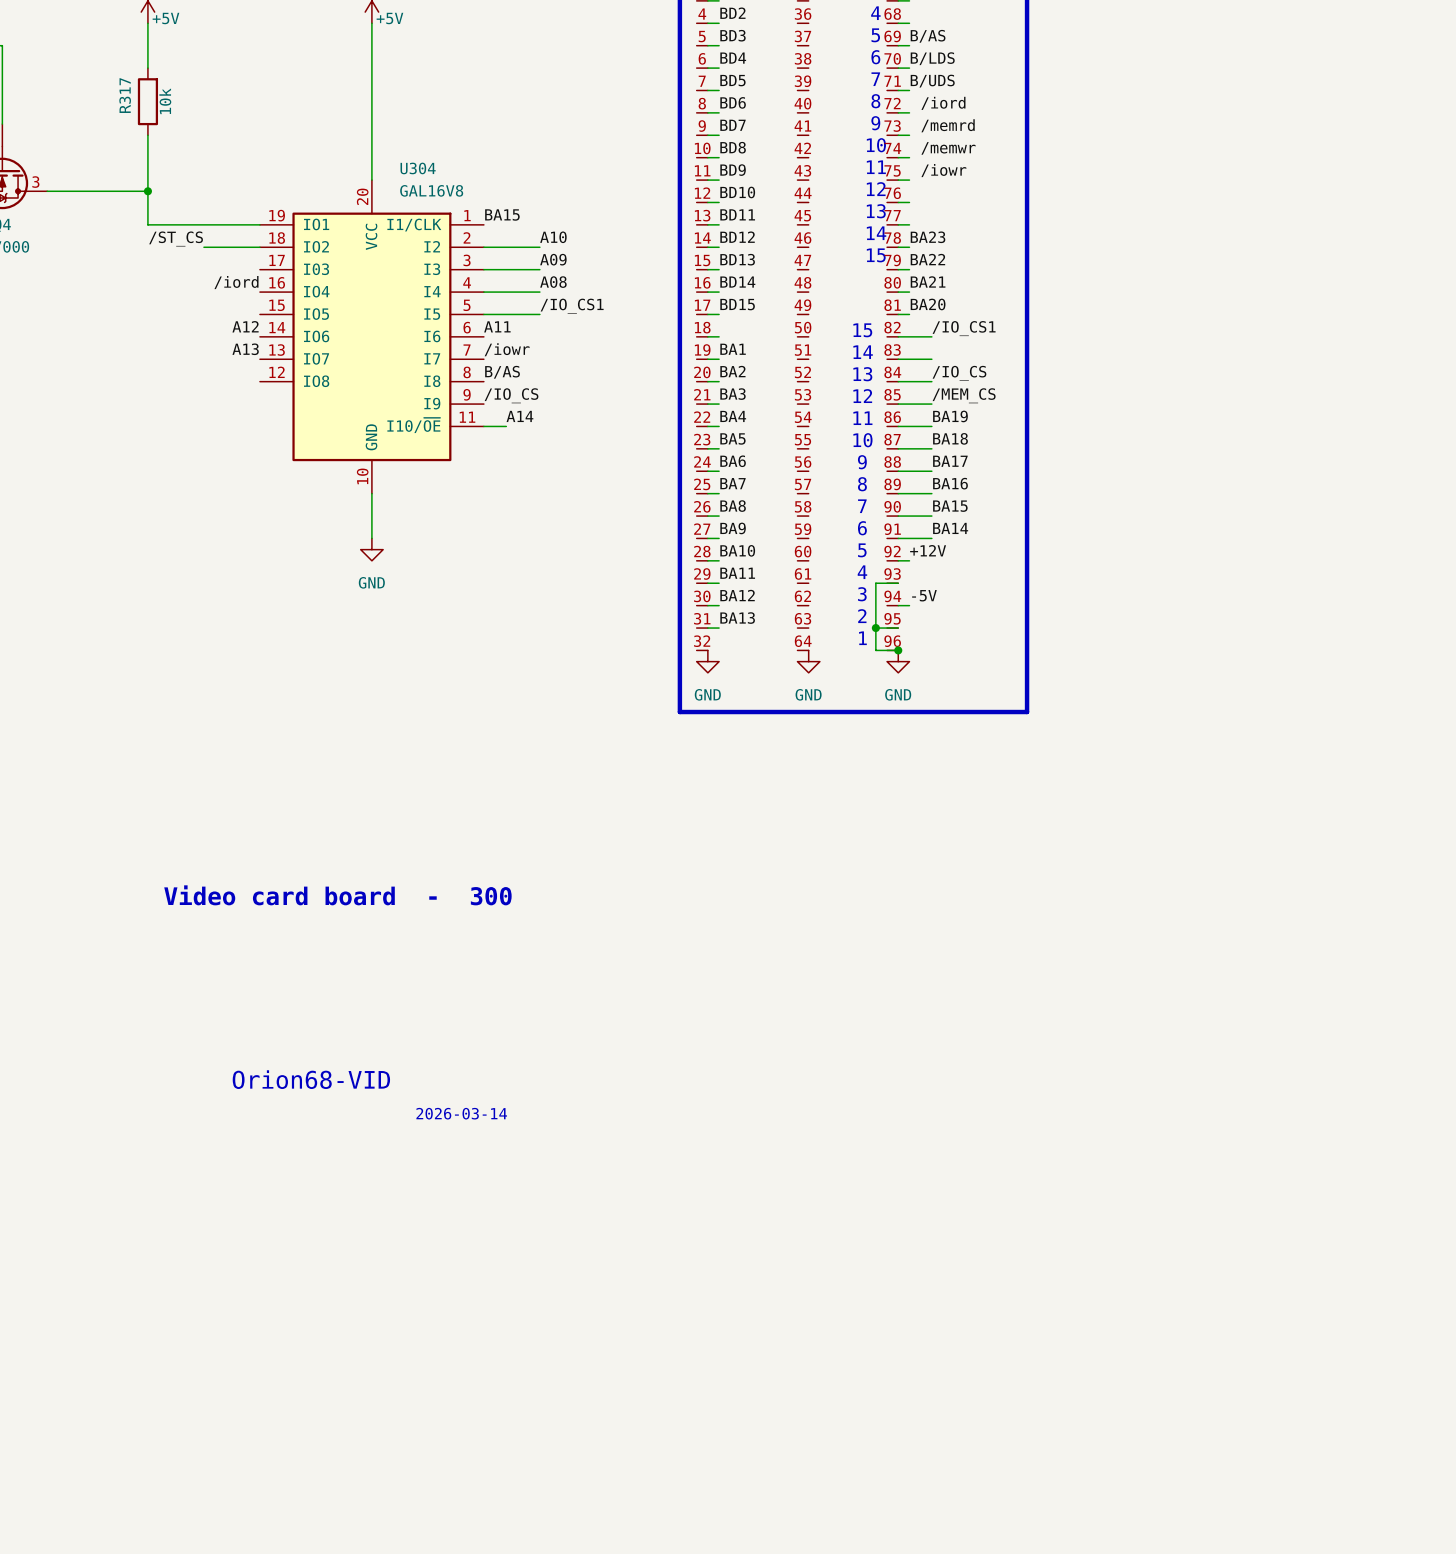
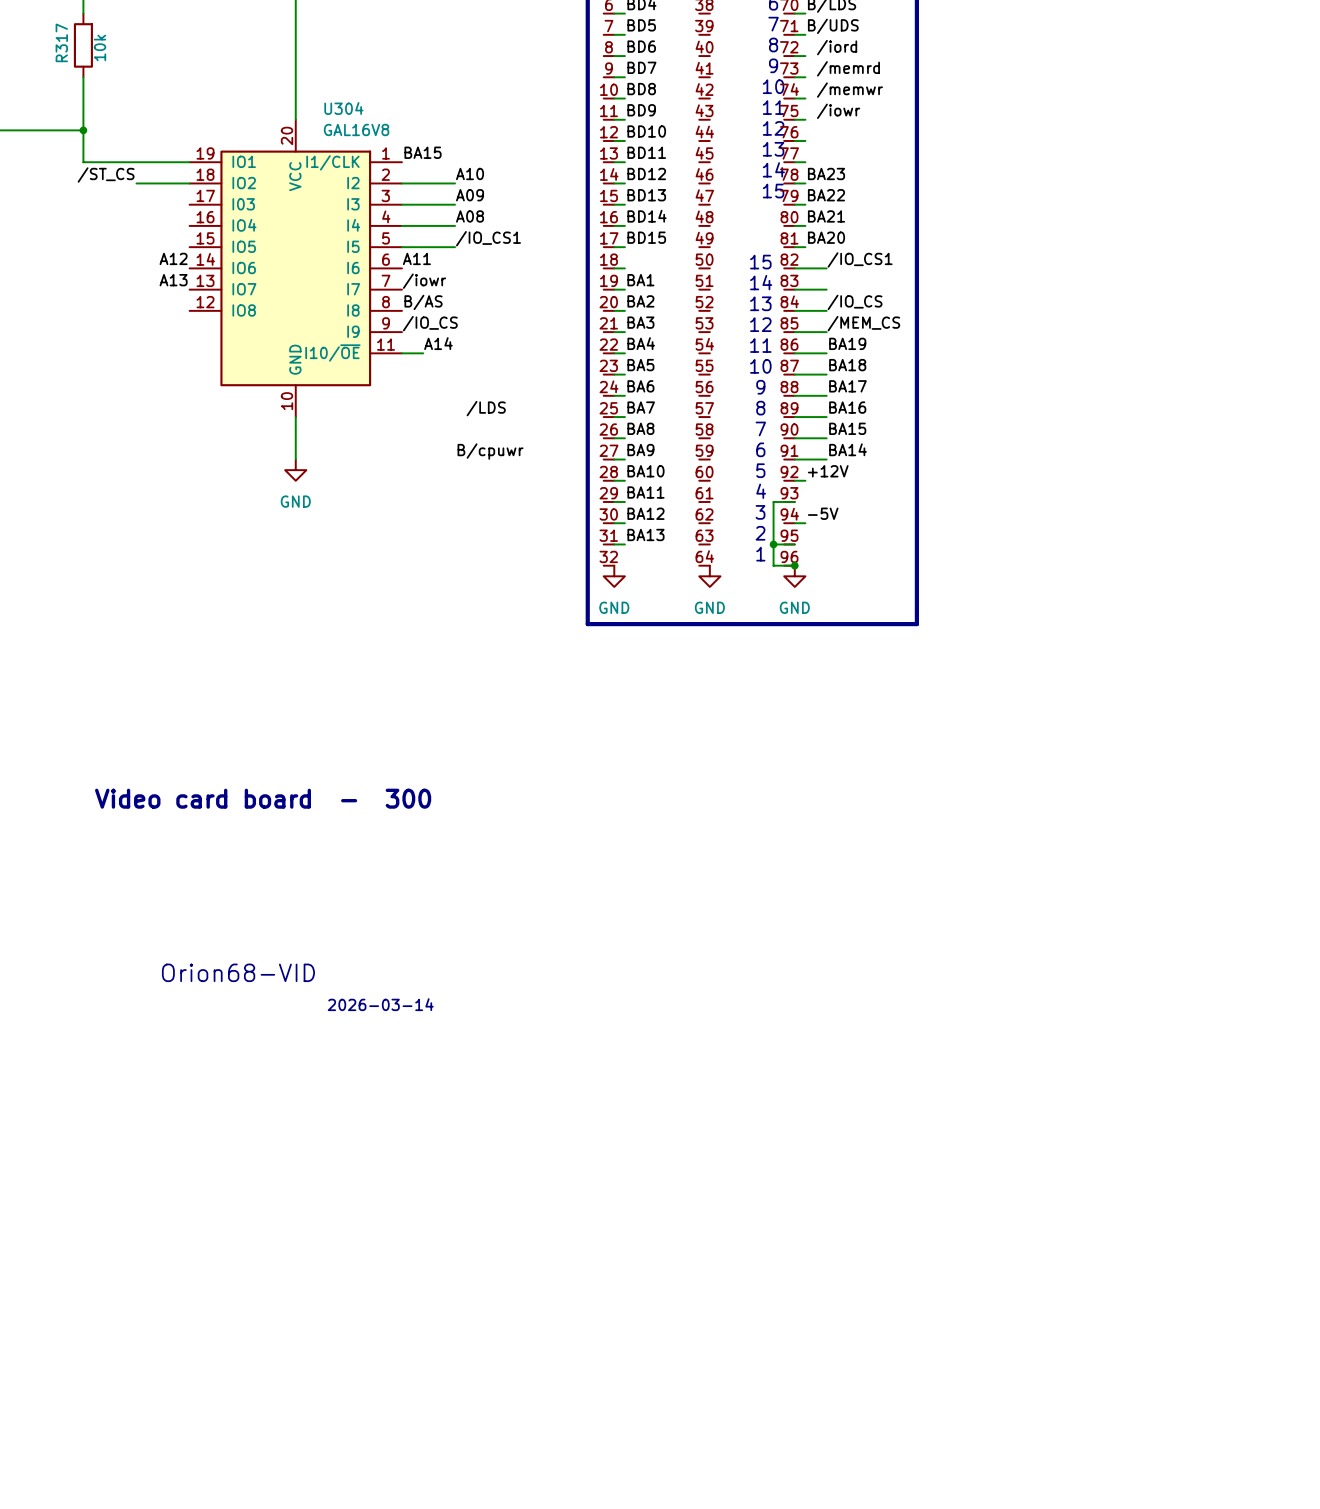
label: /iord (236, 282) -> none
label: none -> /LDS (486, 408)
label: none -> B/cpuwr (490, 451)

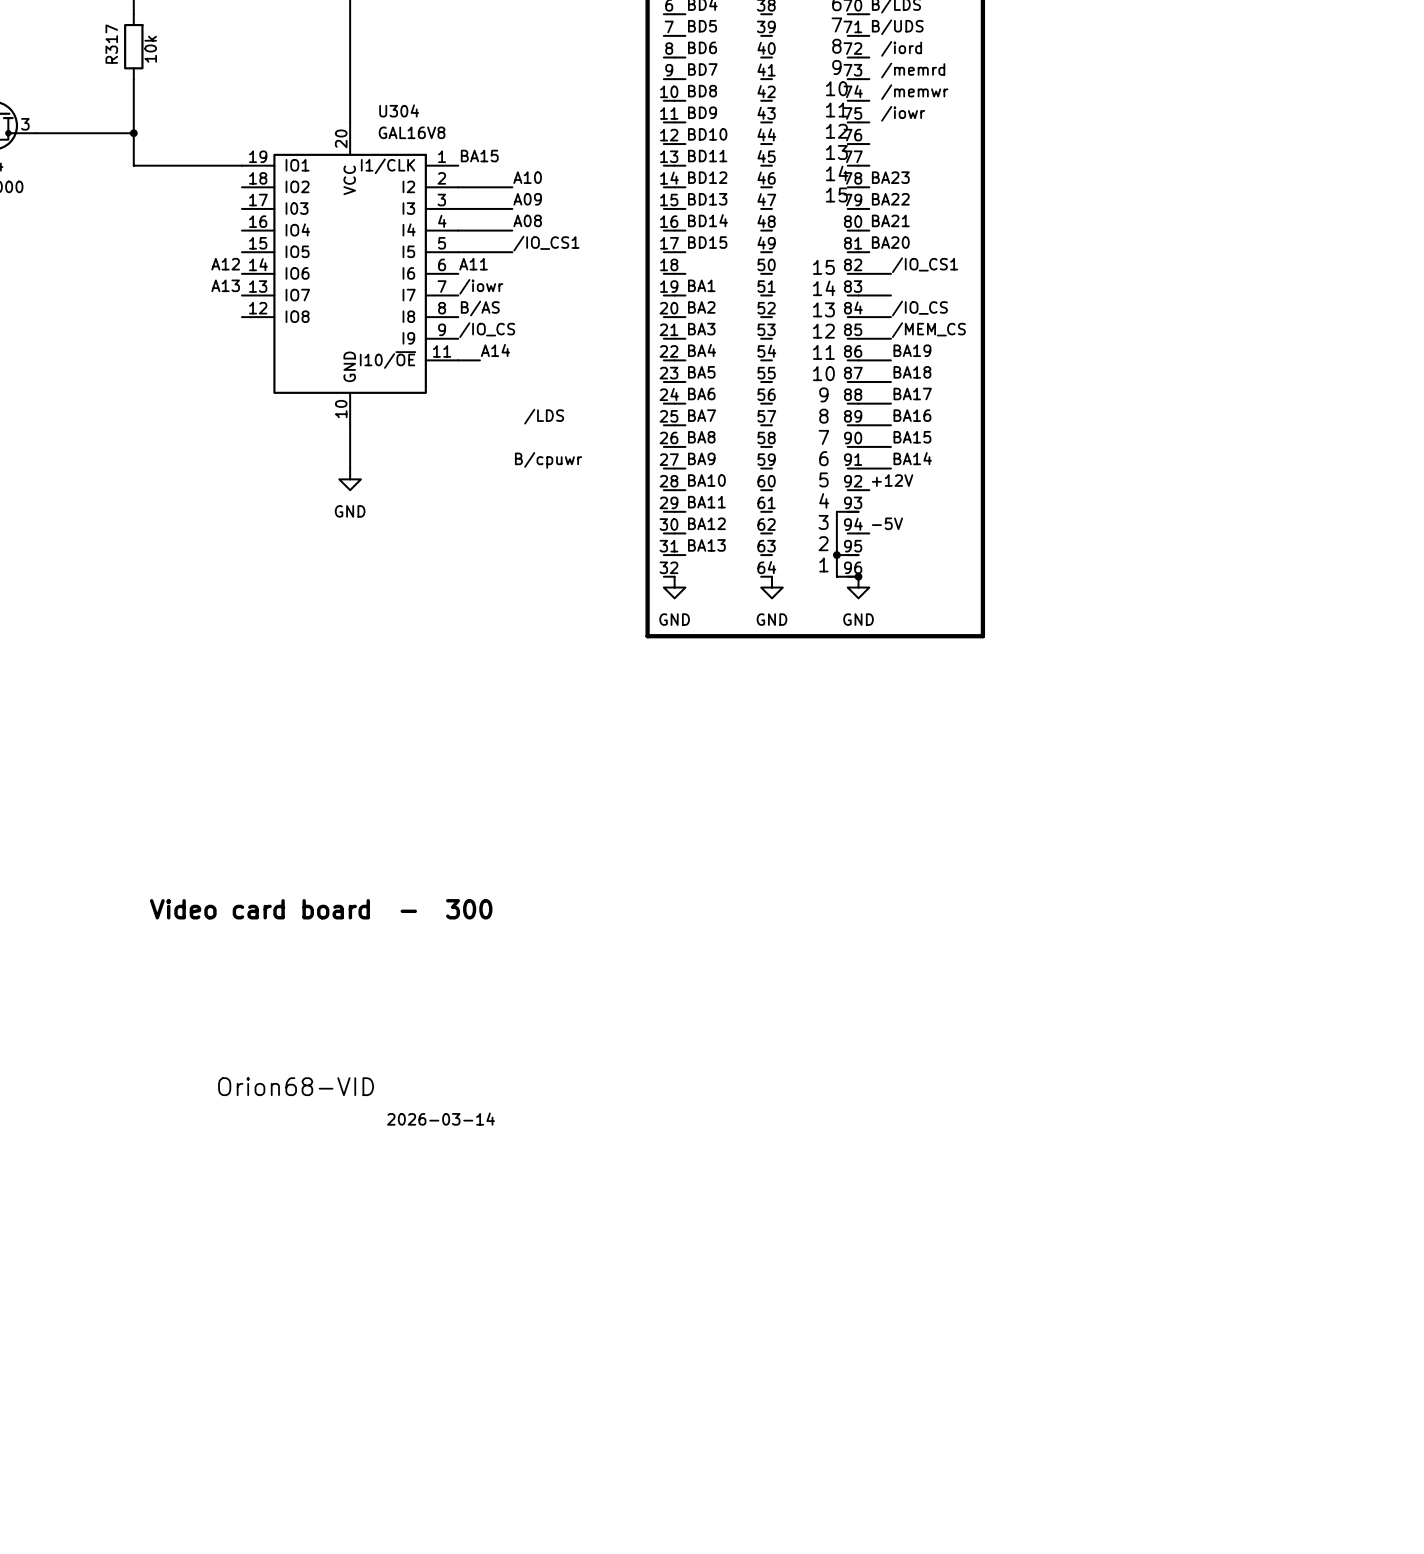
label: /ST_CS (106, 175) -> none
wire: (136, 183) (189, 183) -> none
text position: Video card board - 300 (263, 798) -> Video card board - 300 (321, 909)
text position: Orion68-VID (238, 972) -> Orion68-VID (296, 1086)
text position: 2026-03-14 (380, 1004) -> 2026-03-14 (440, 1119)

